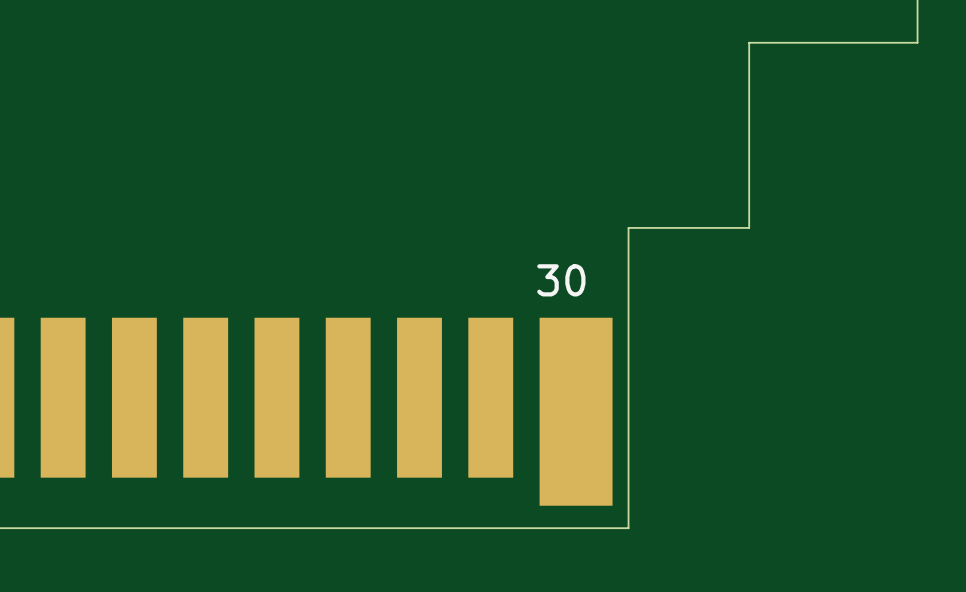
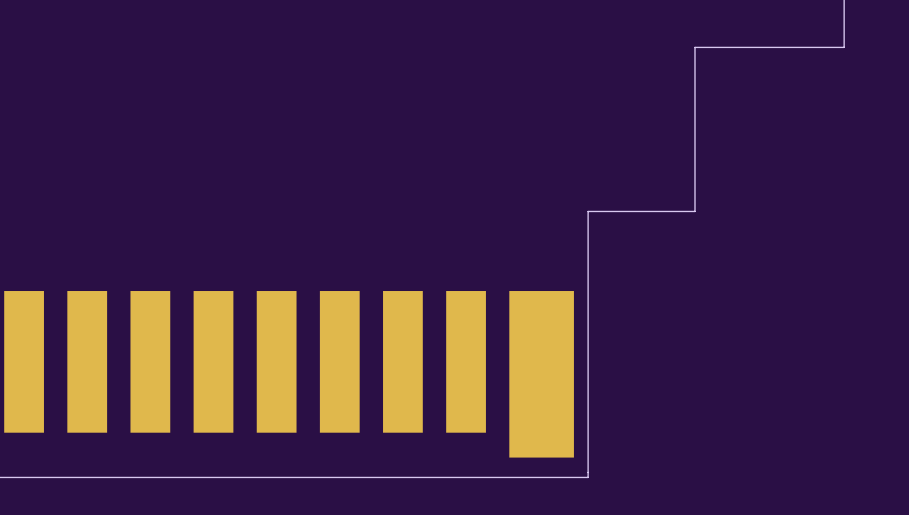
text: 30 (561, 280) -> none

